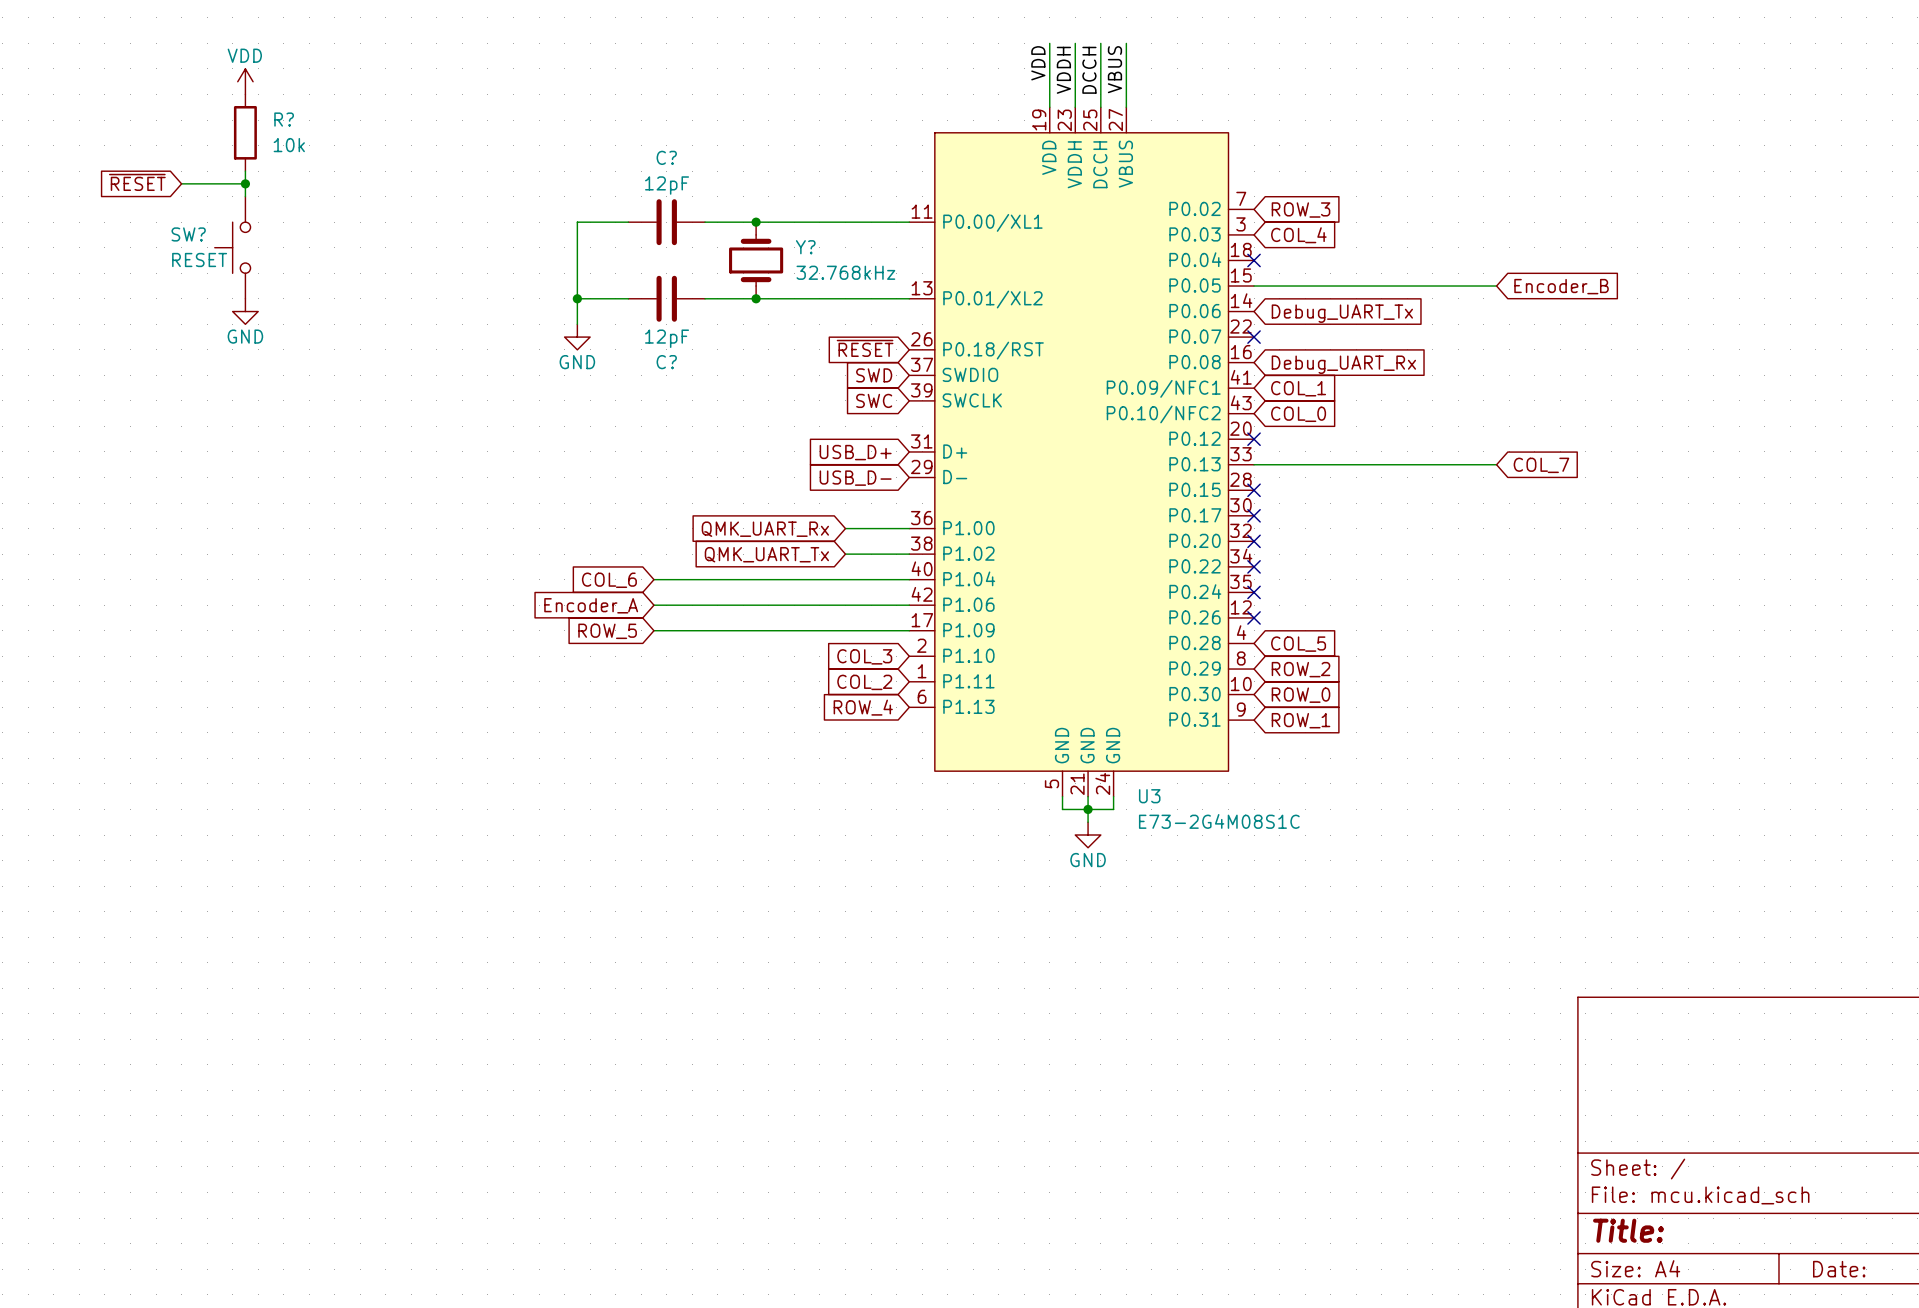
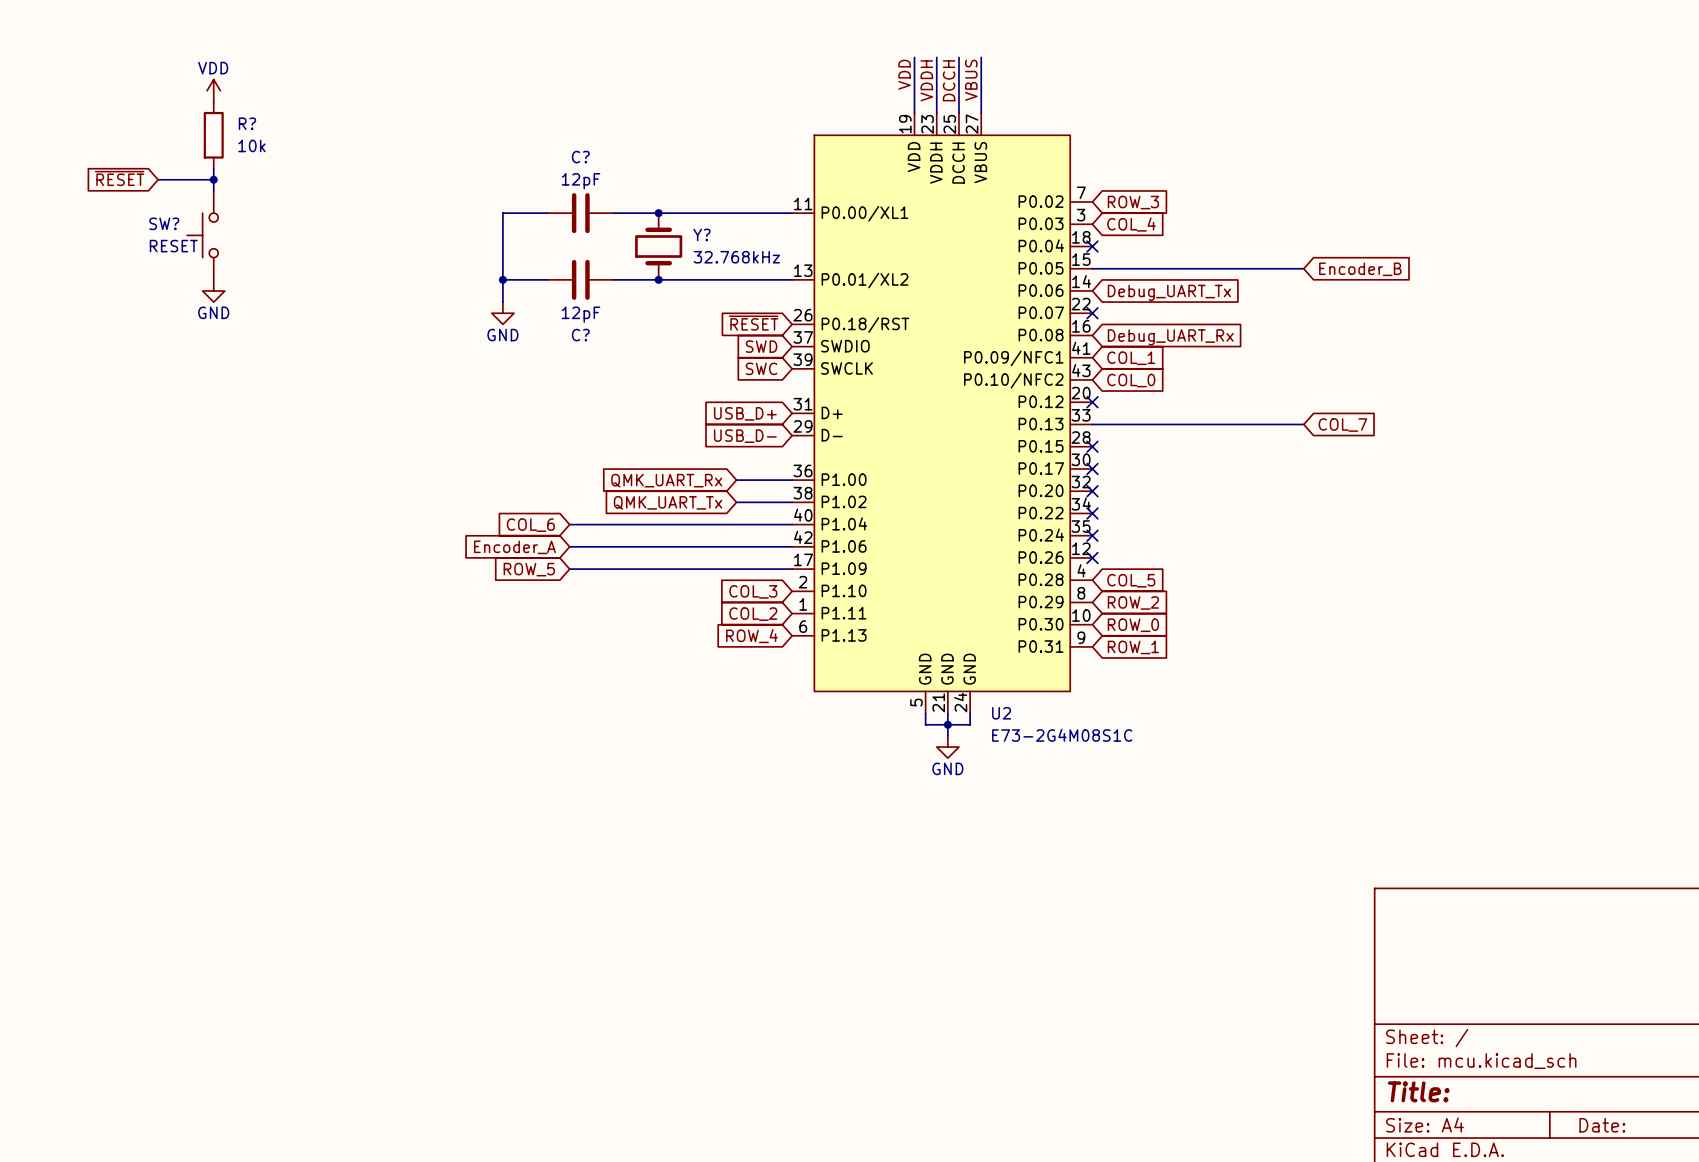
U3 name: U3 (1149, 796) -> U2 (1001, 713)

